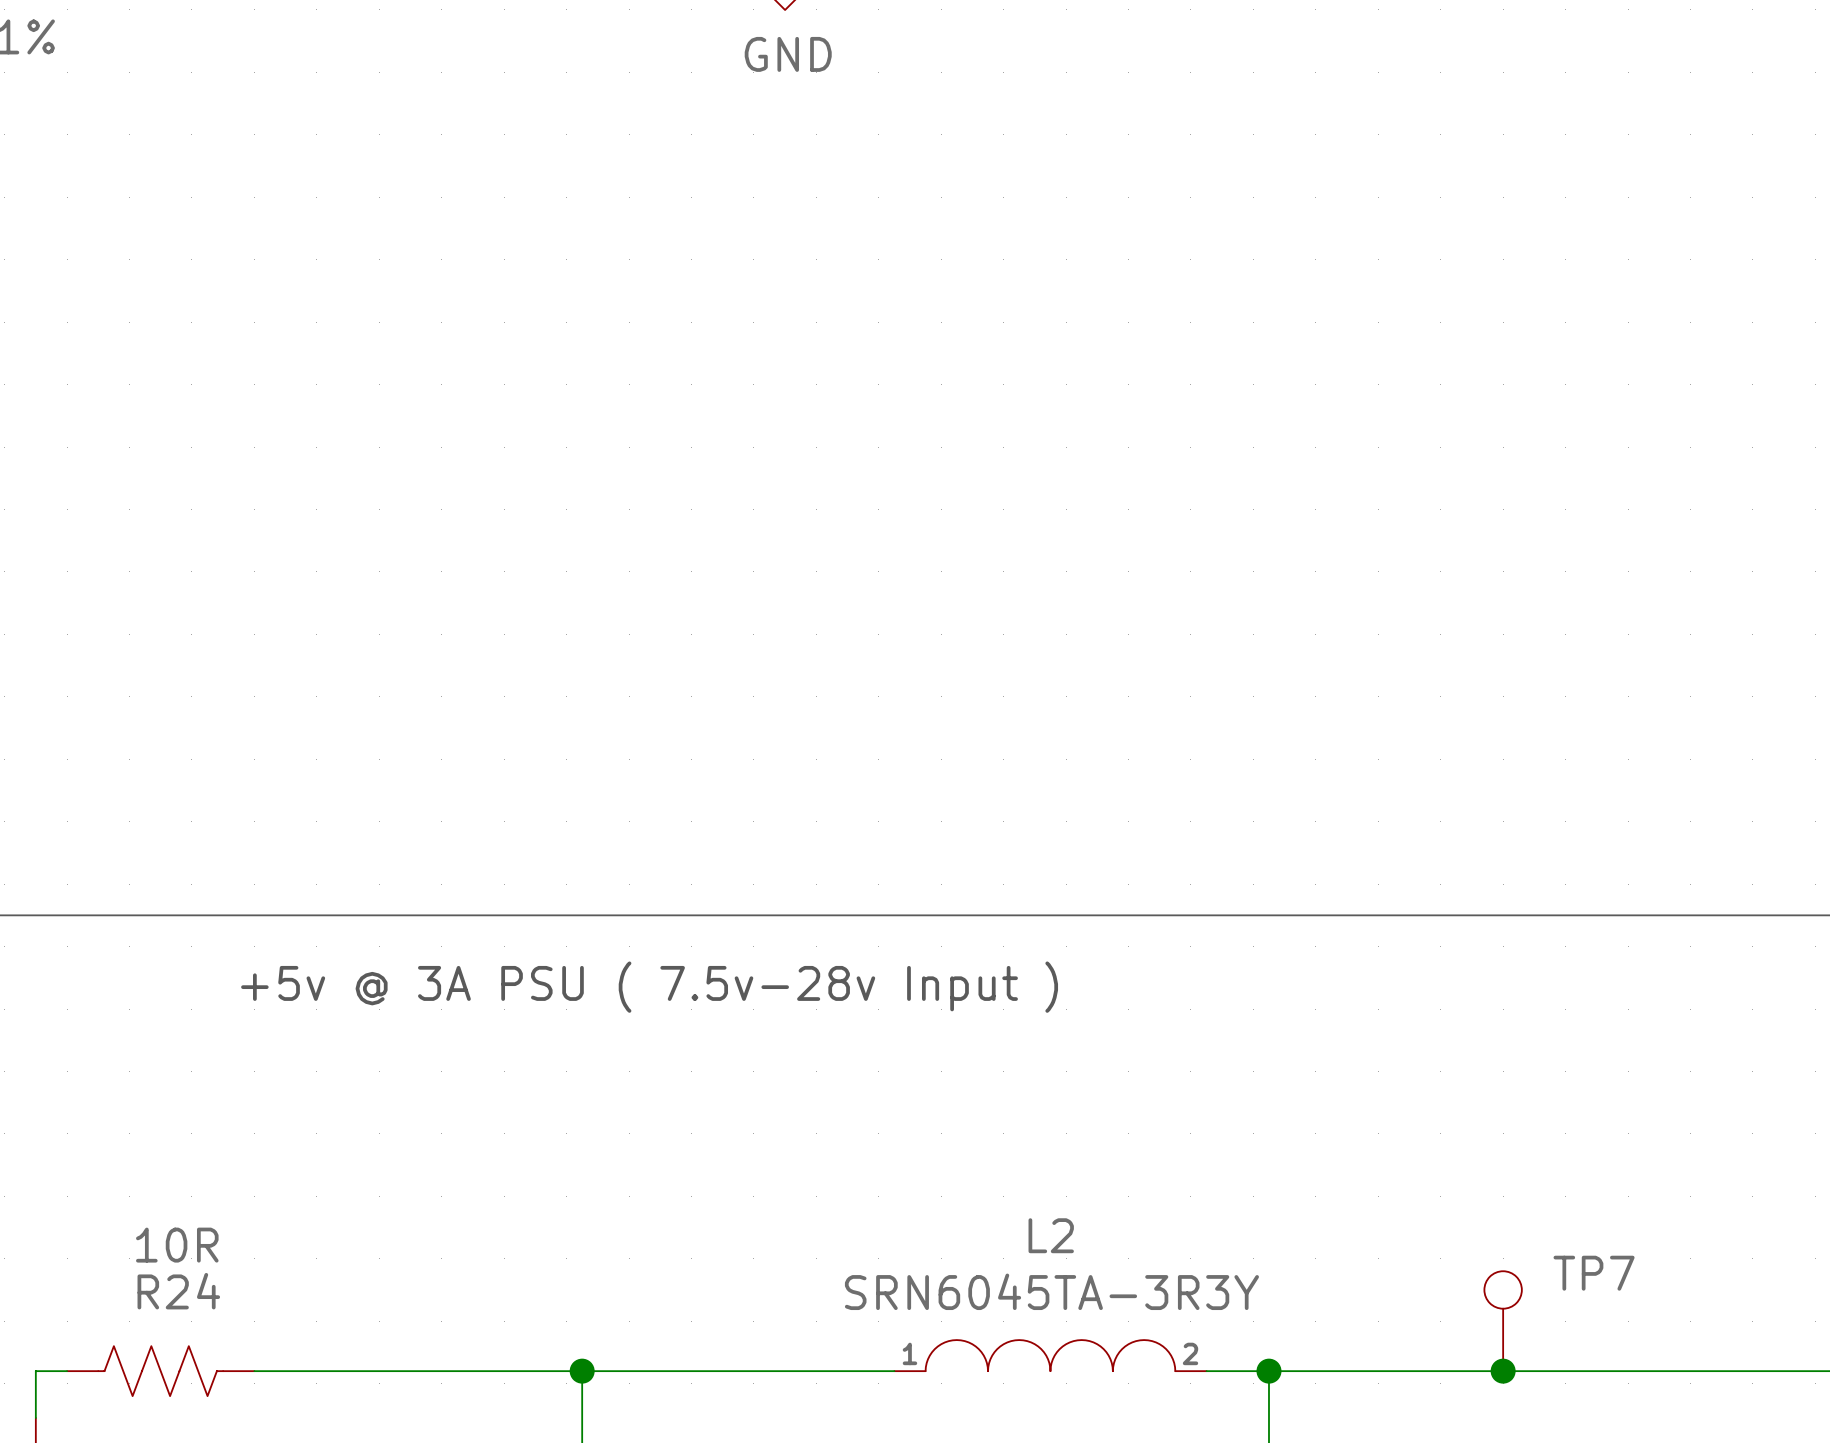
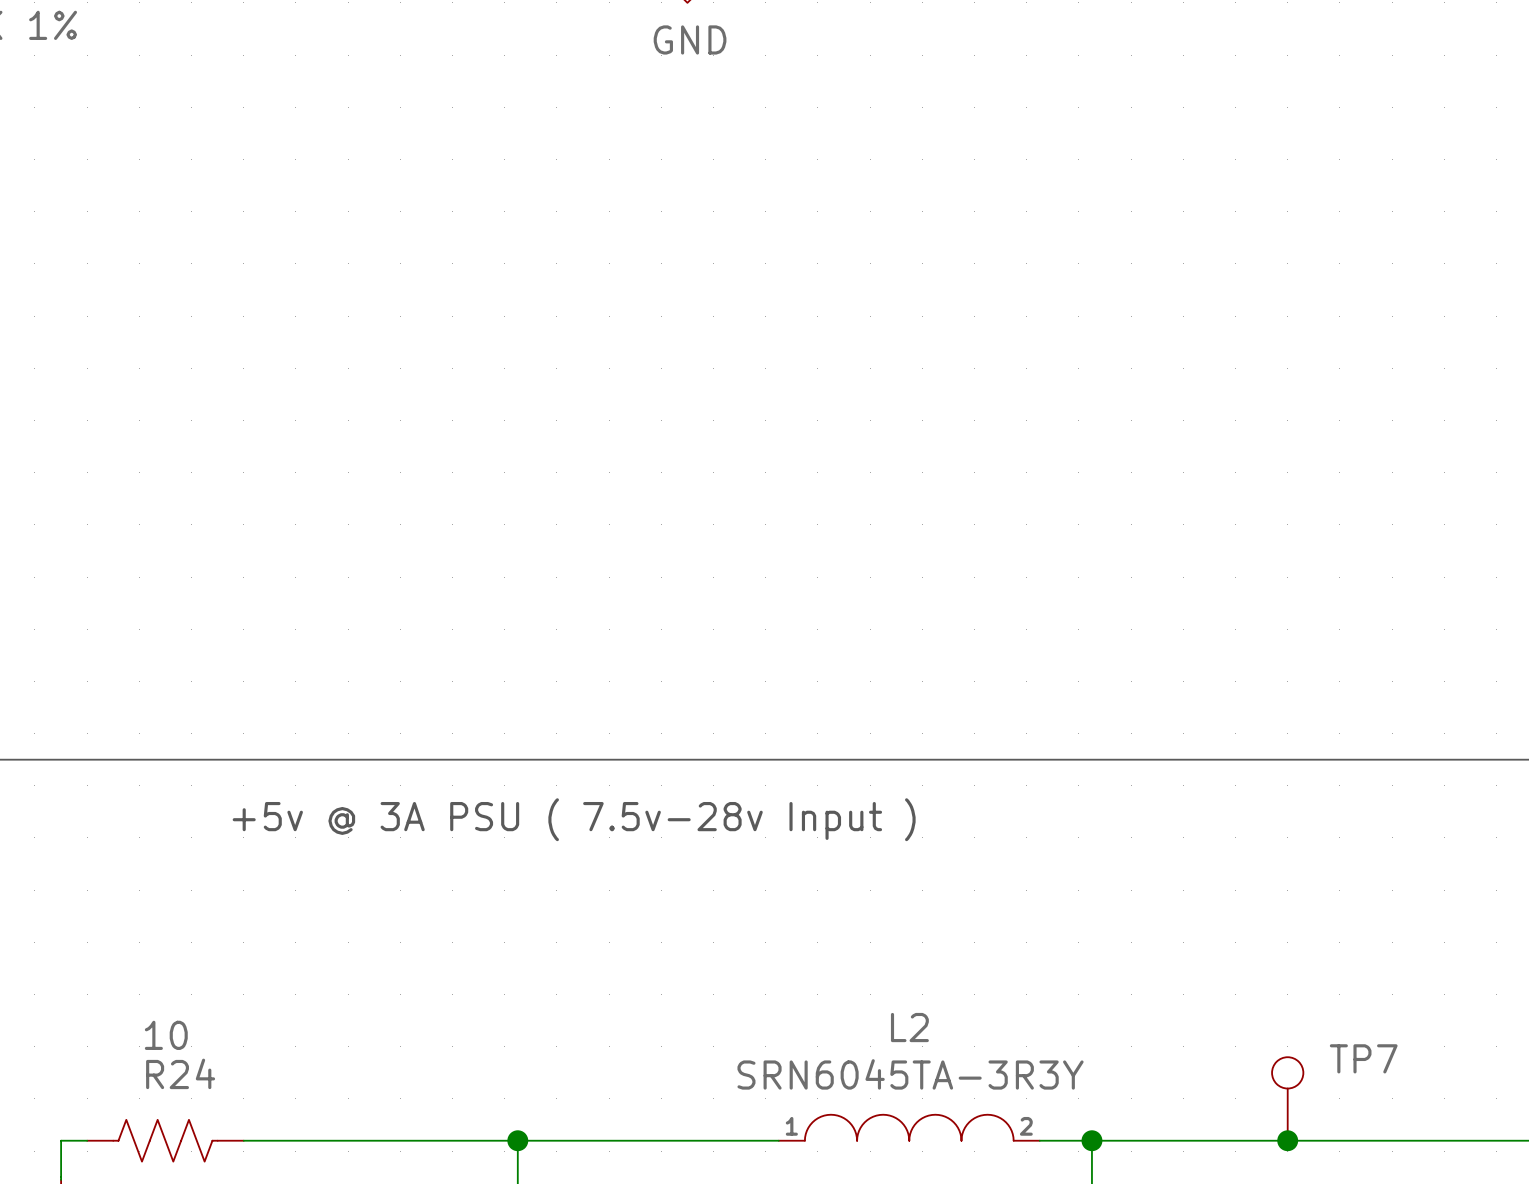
R24 value: 10R (177, 1245) -> 10 (166, 1035)

